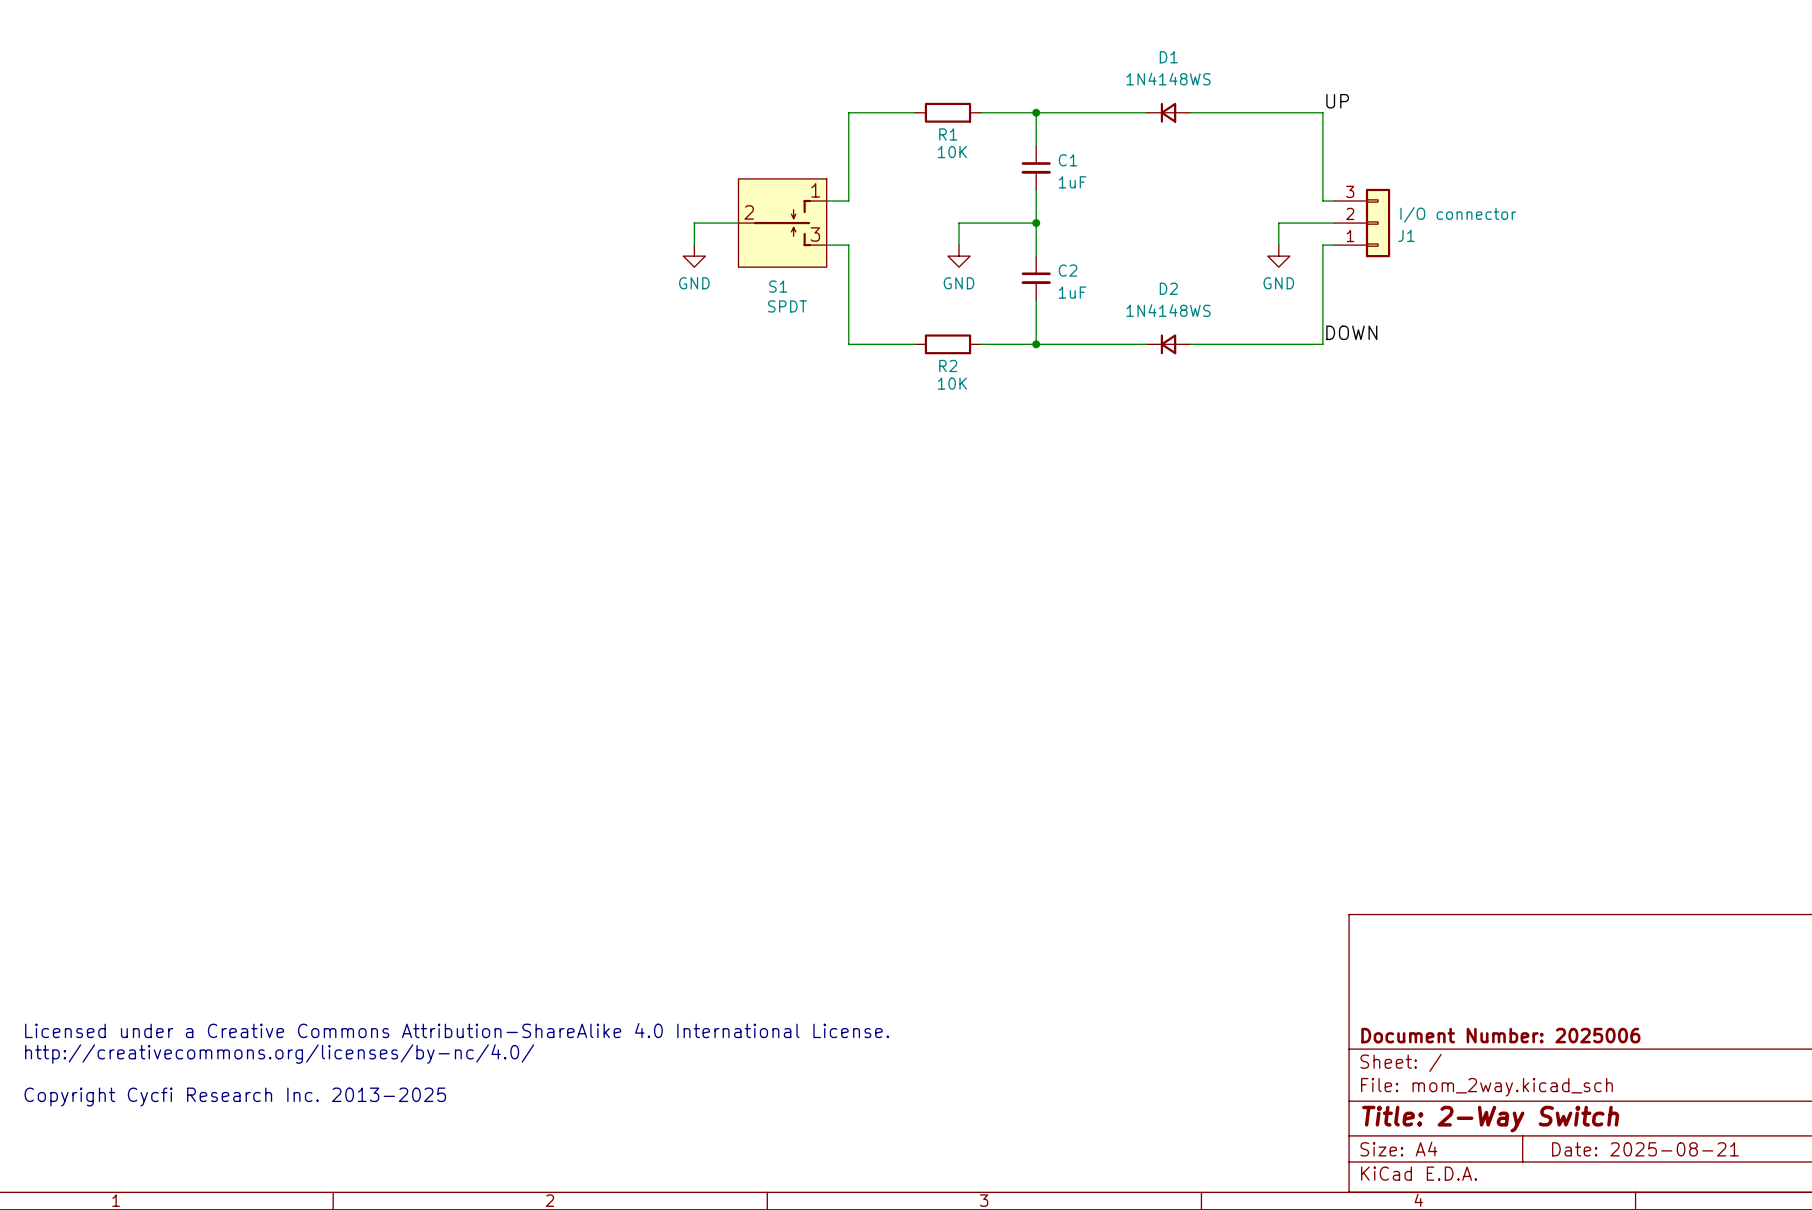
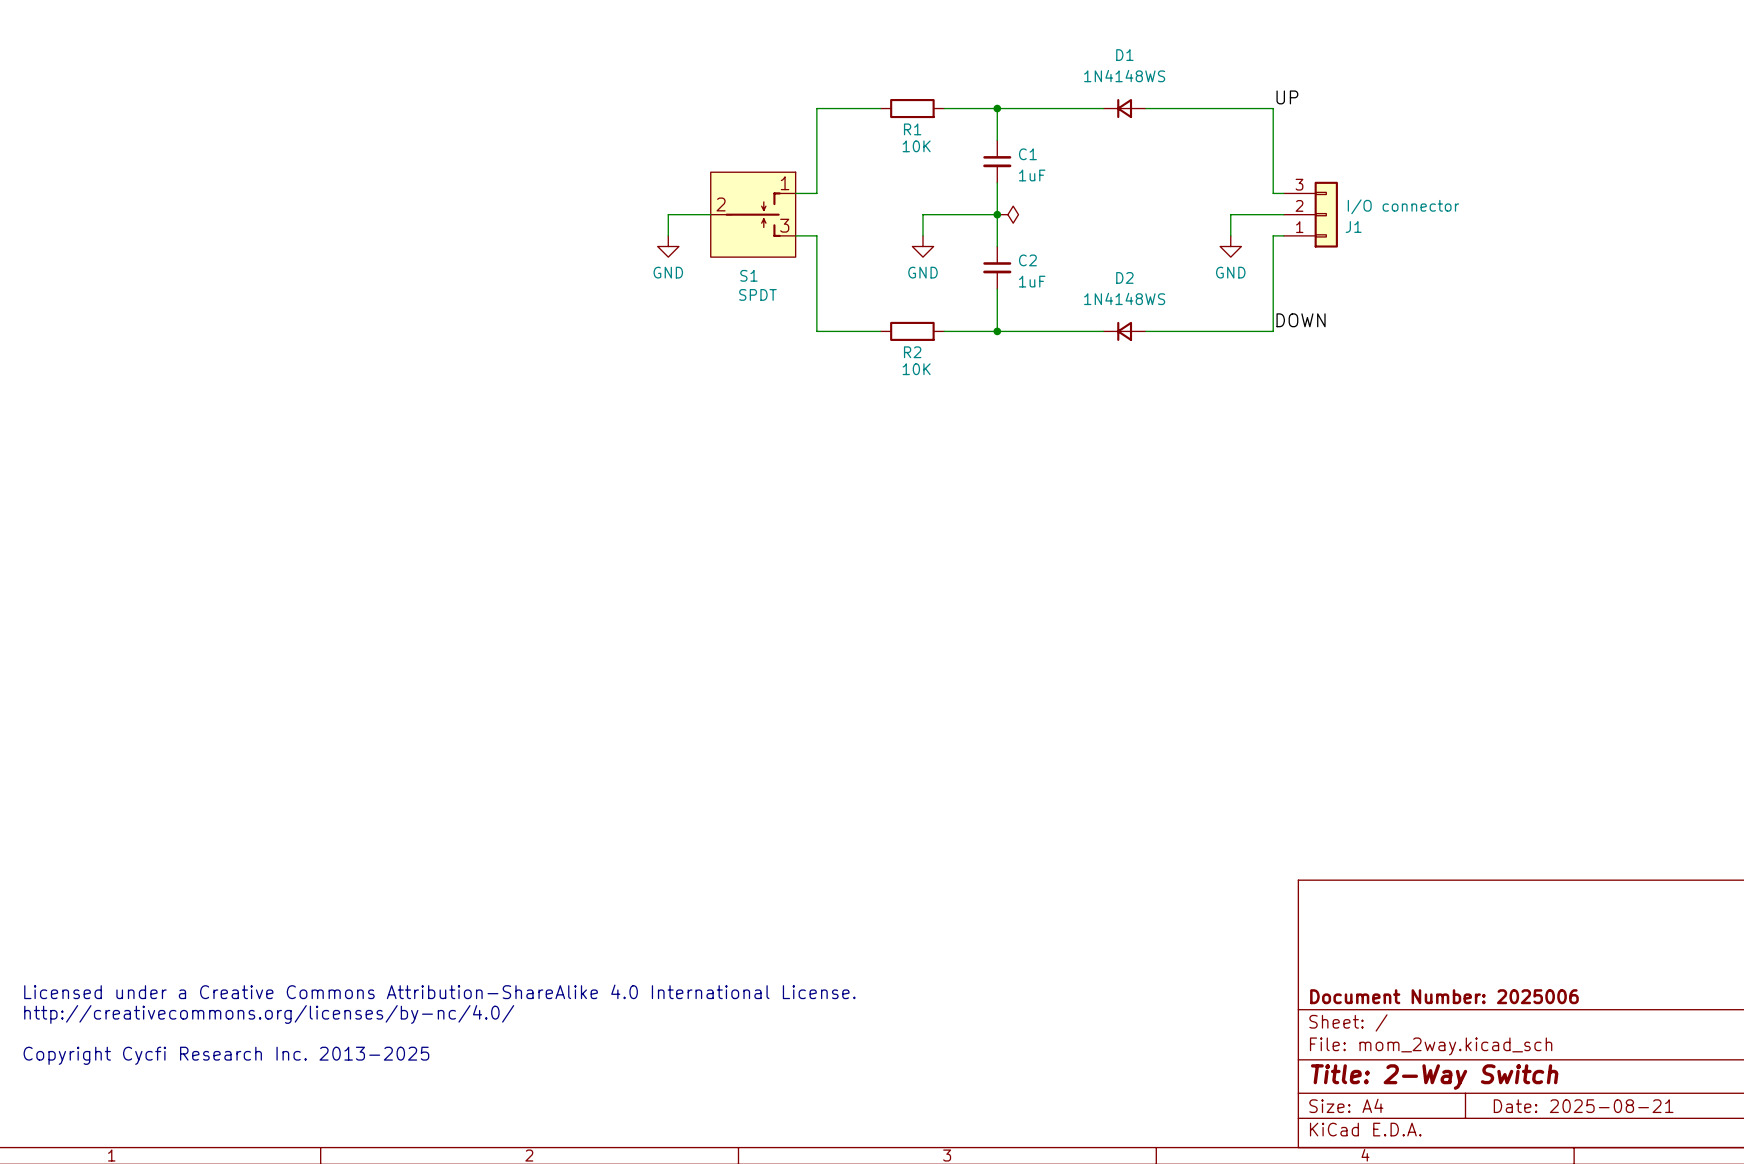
power symbol: none -> (1007, 214)

